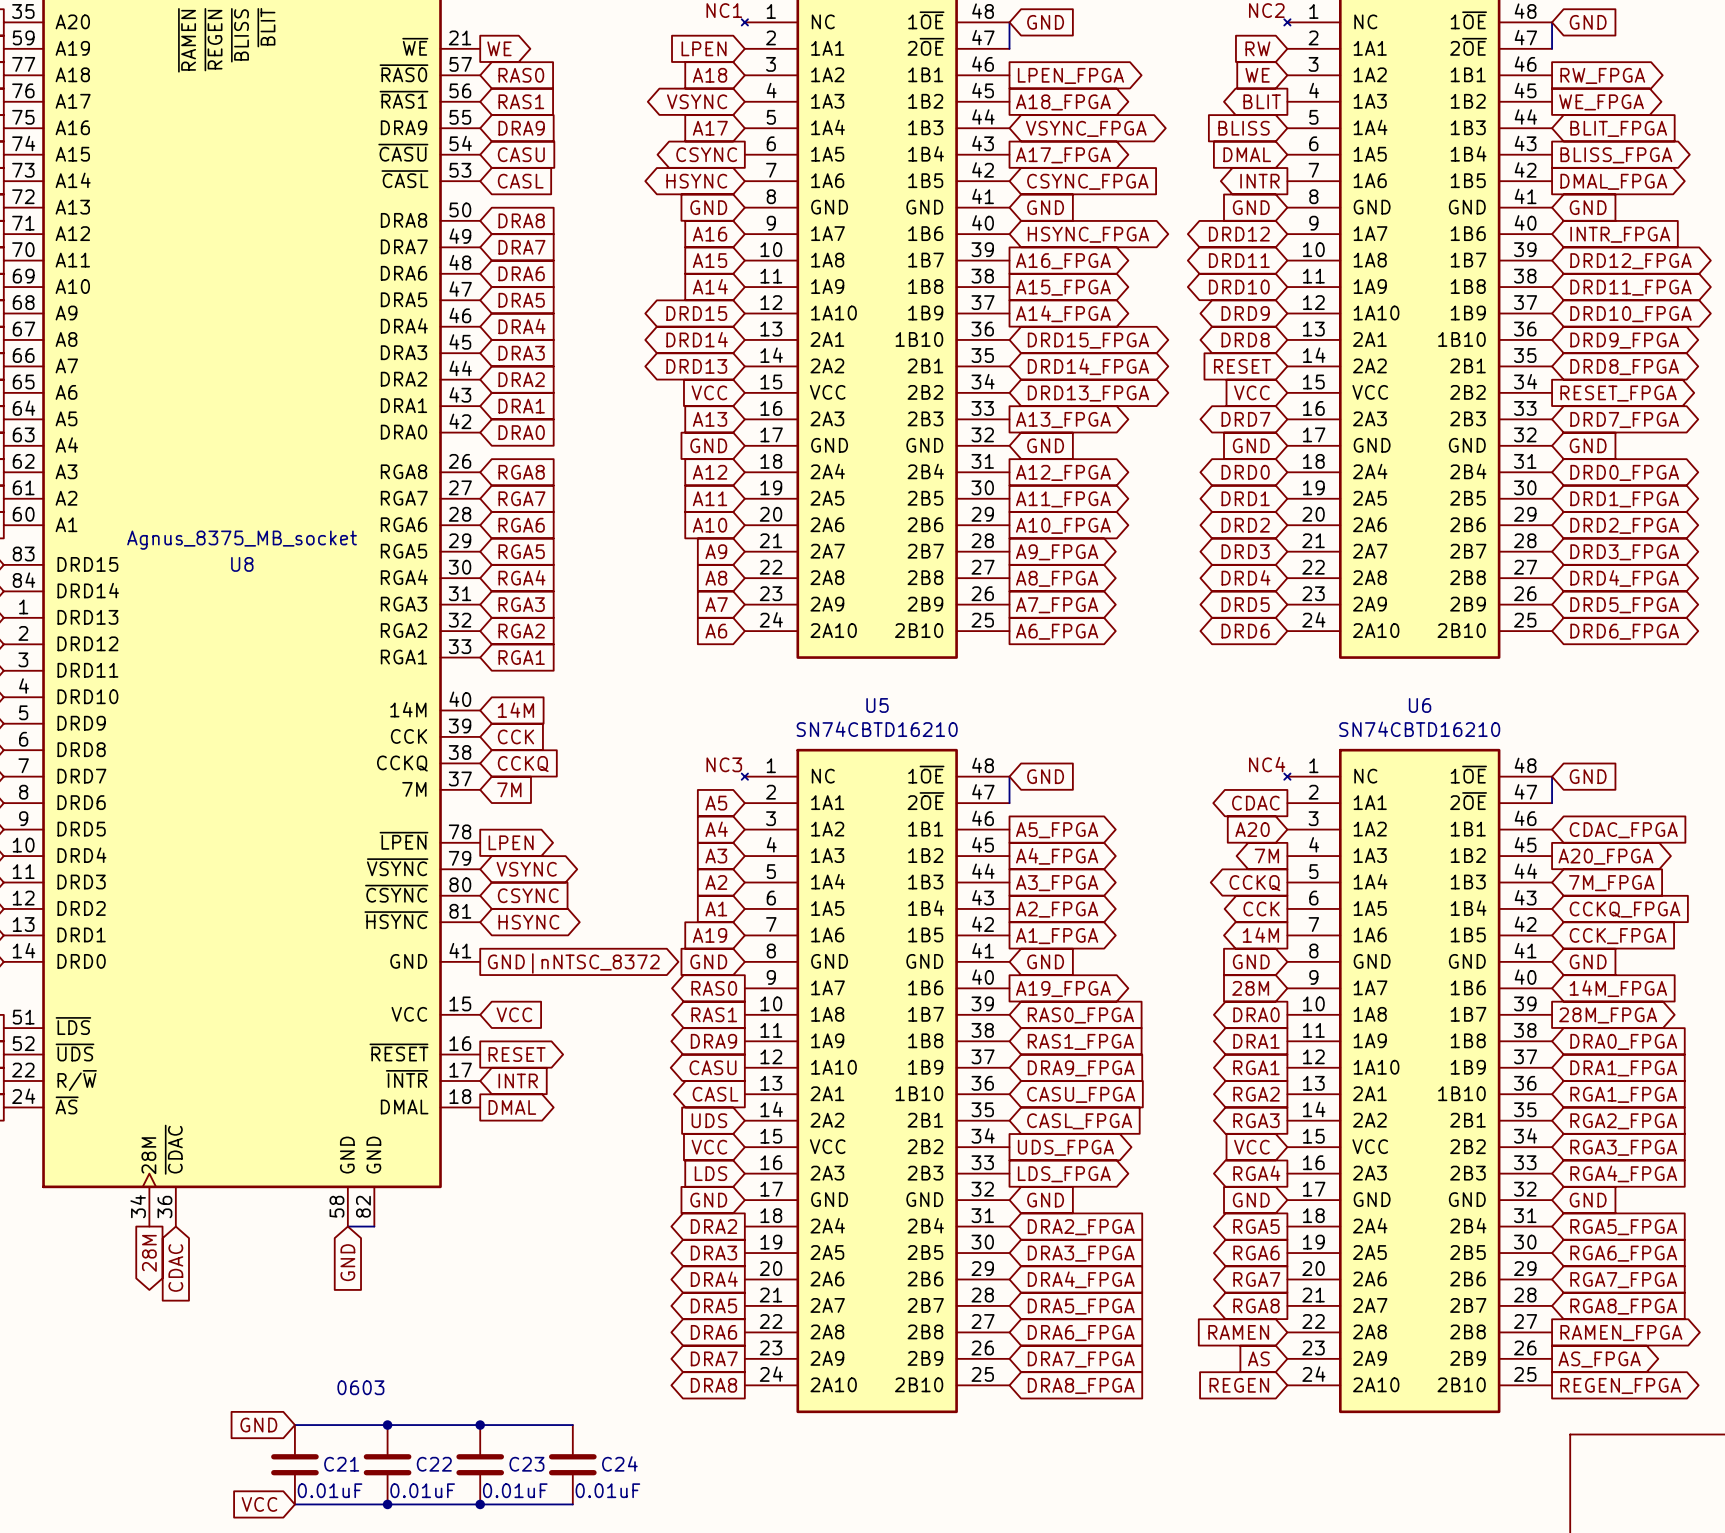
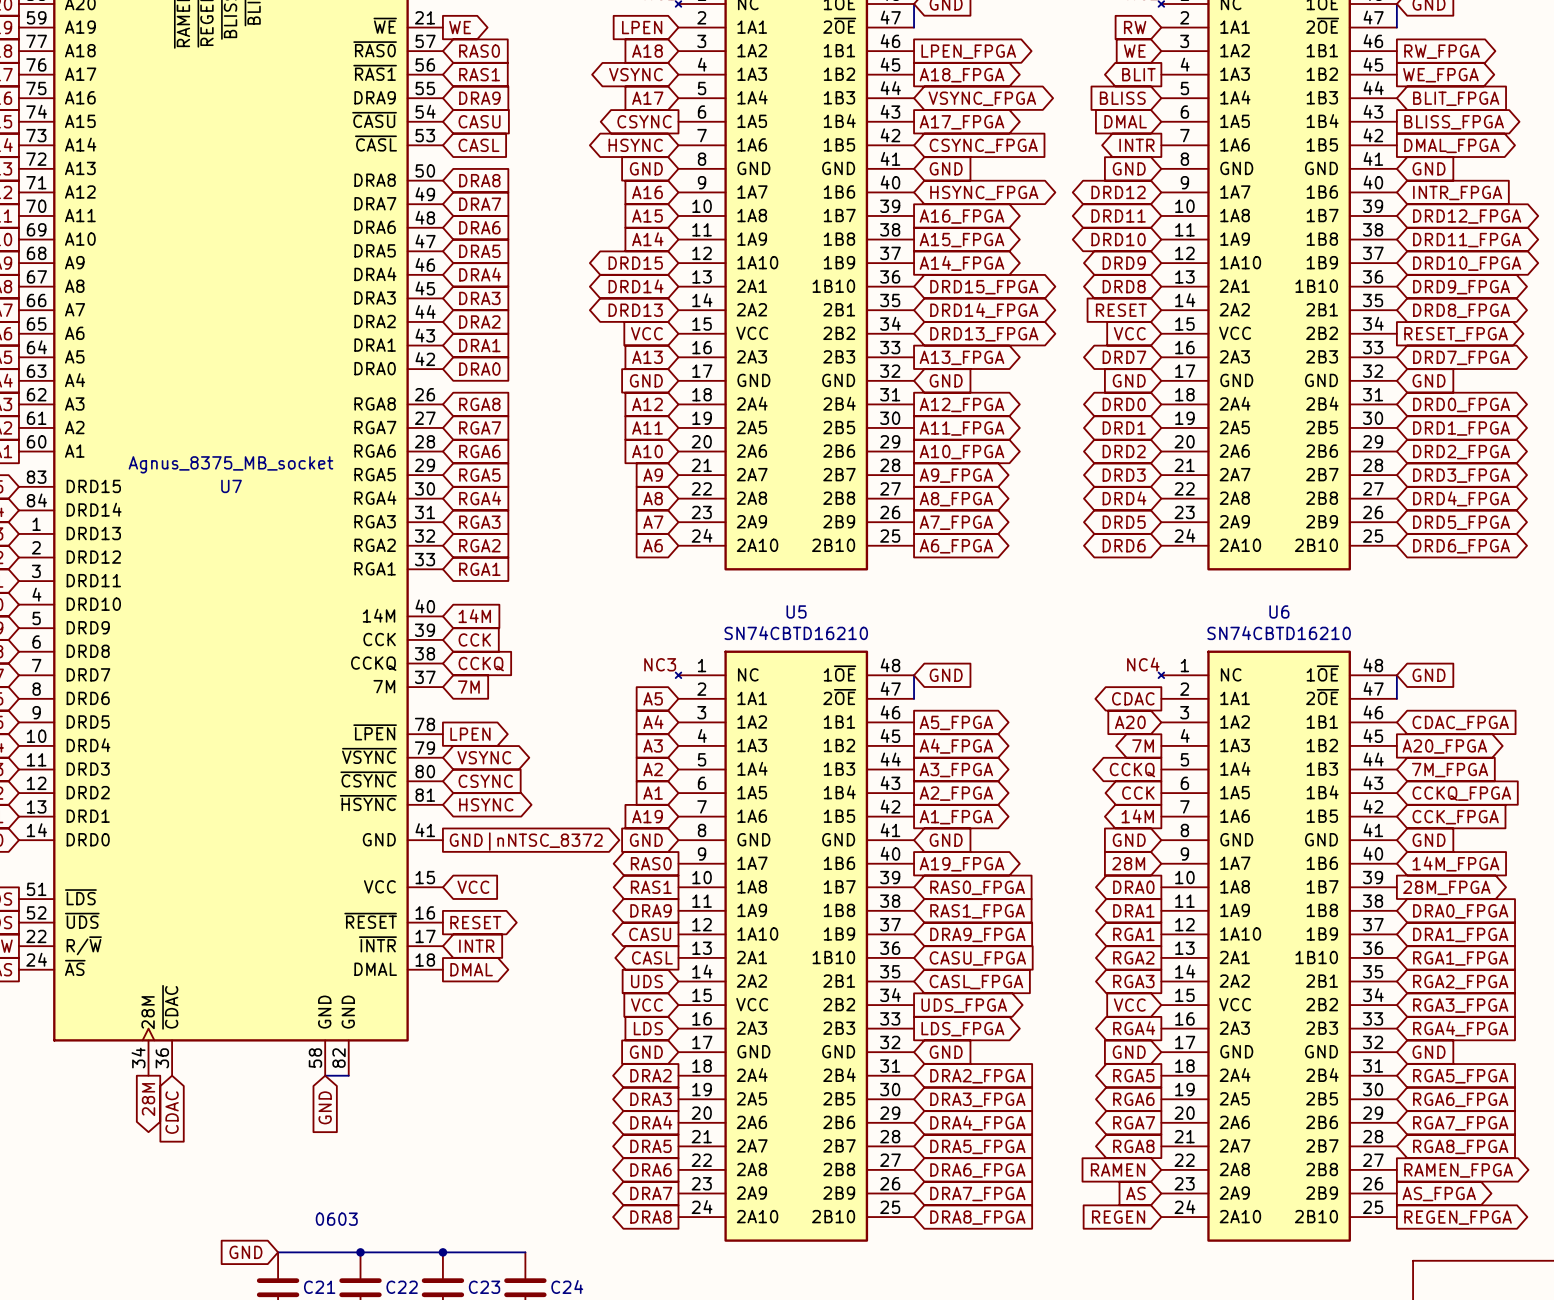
U8 name: U8 (242, 564) -> U7 (231, 486)

